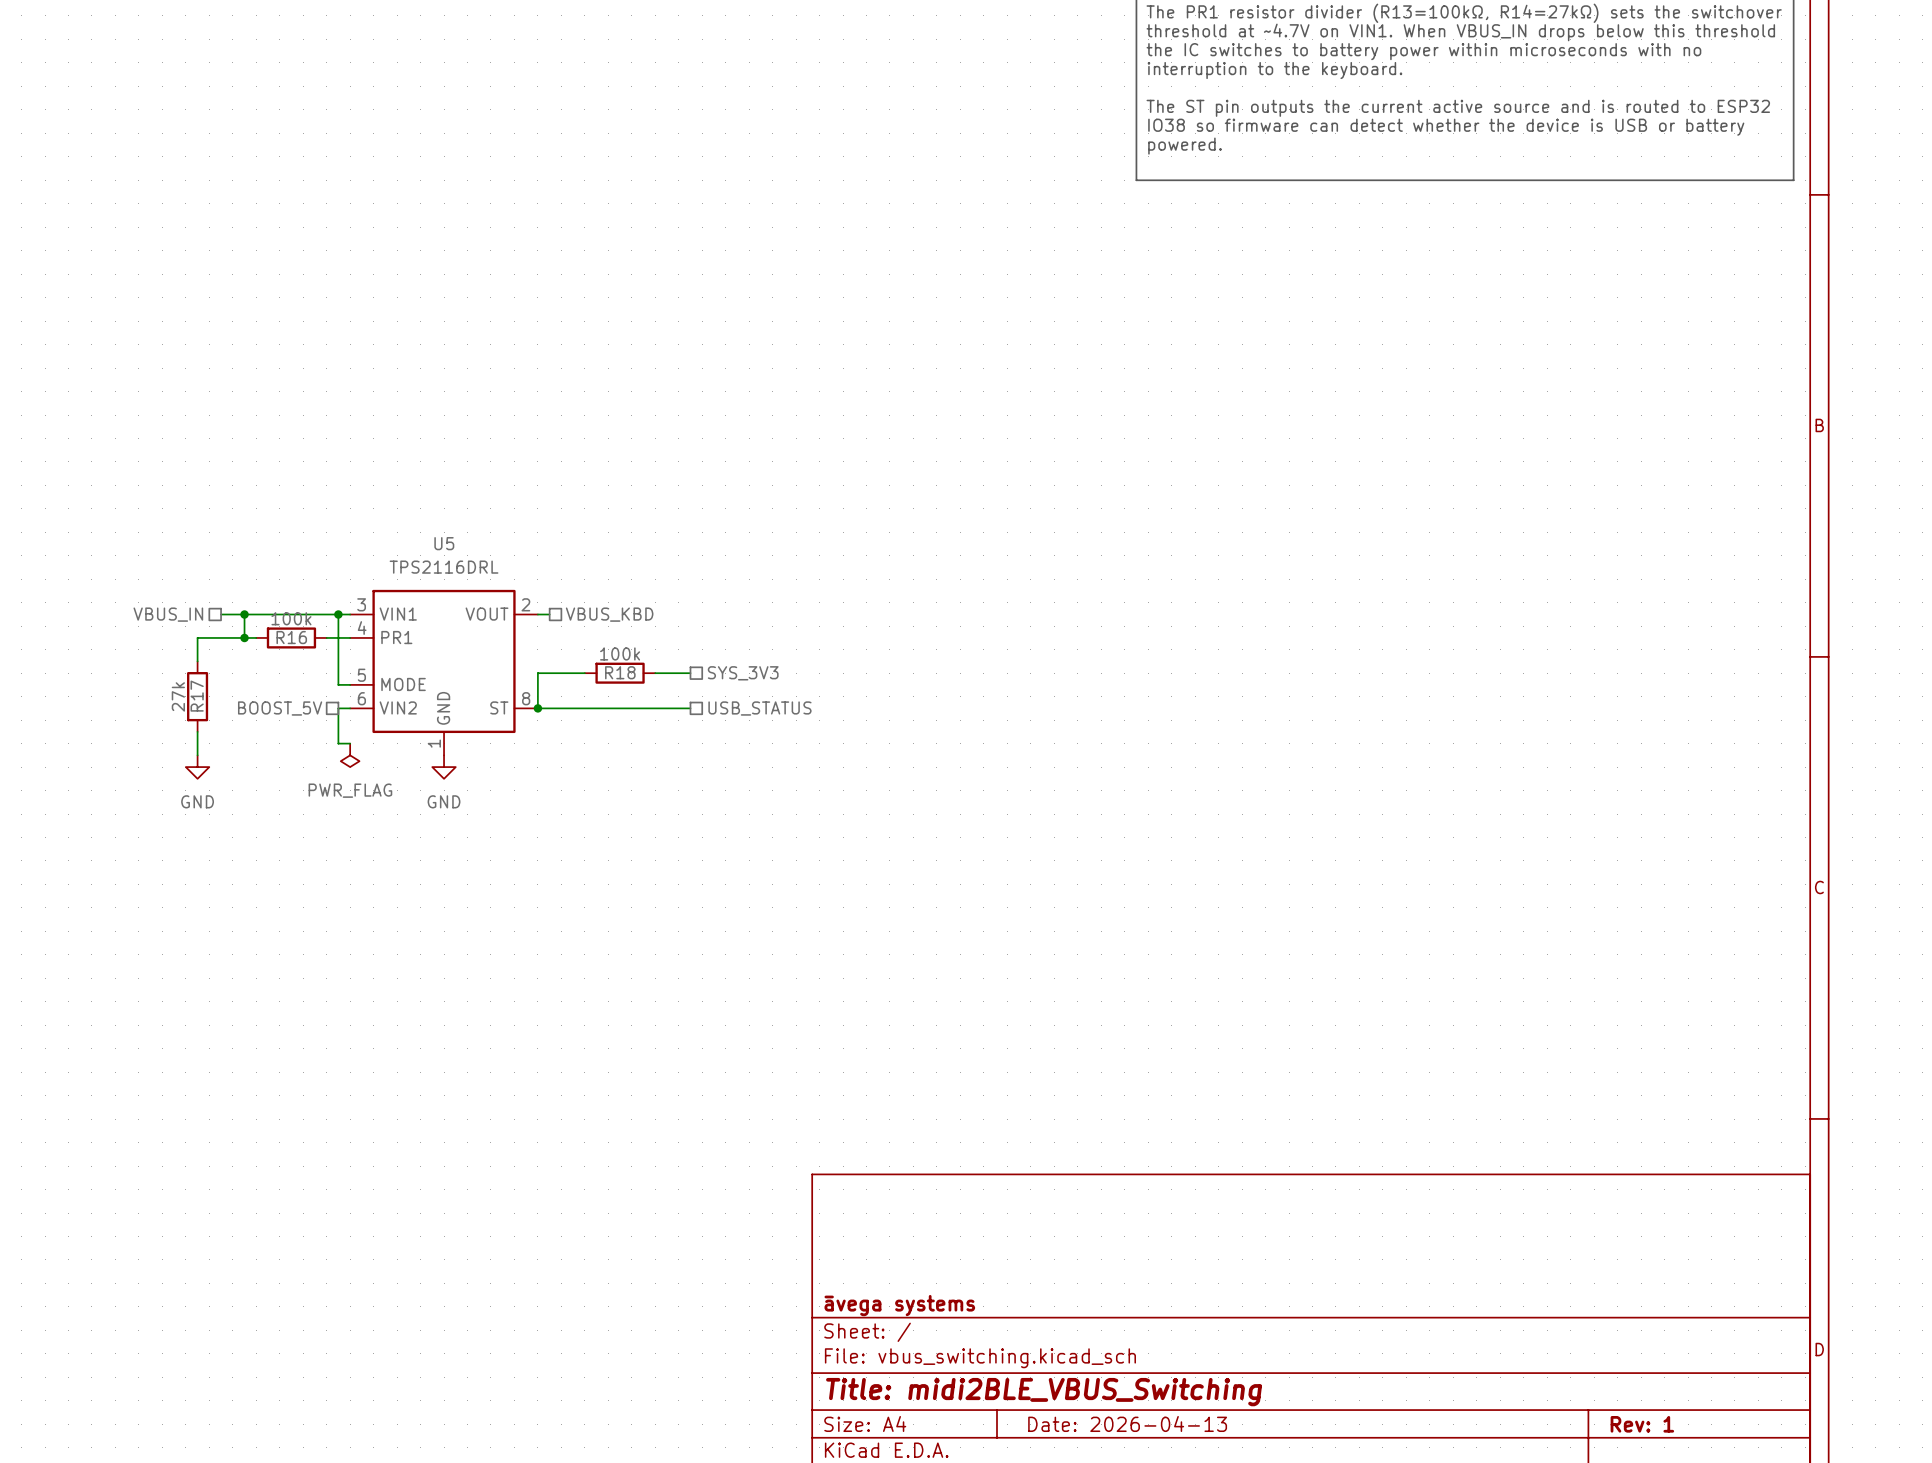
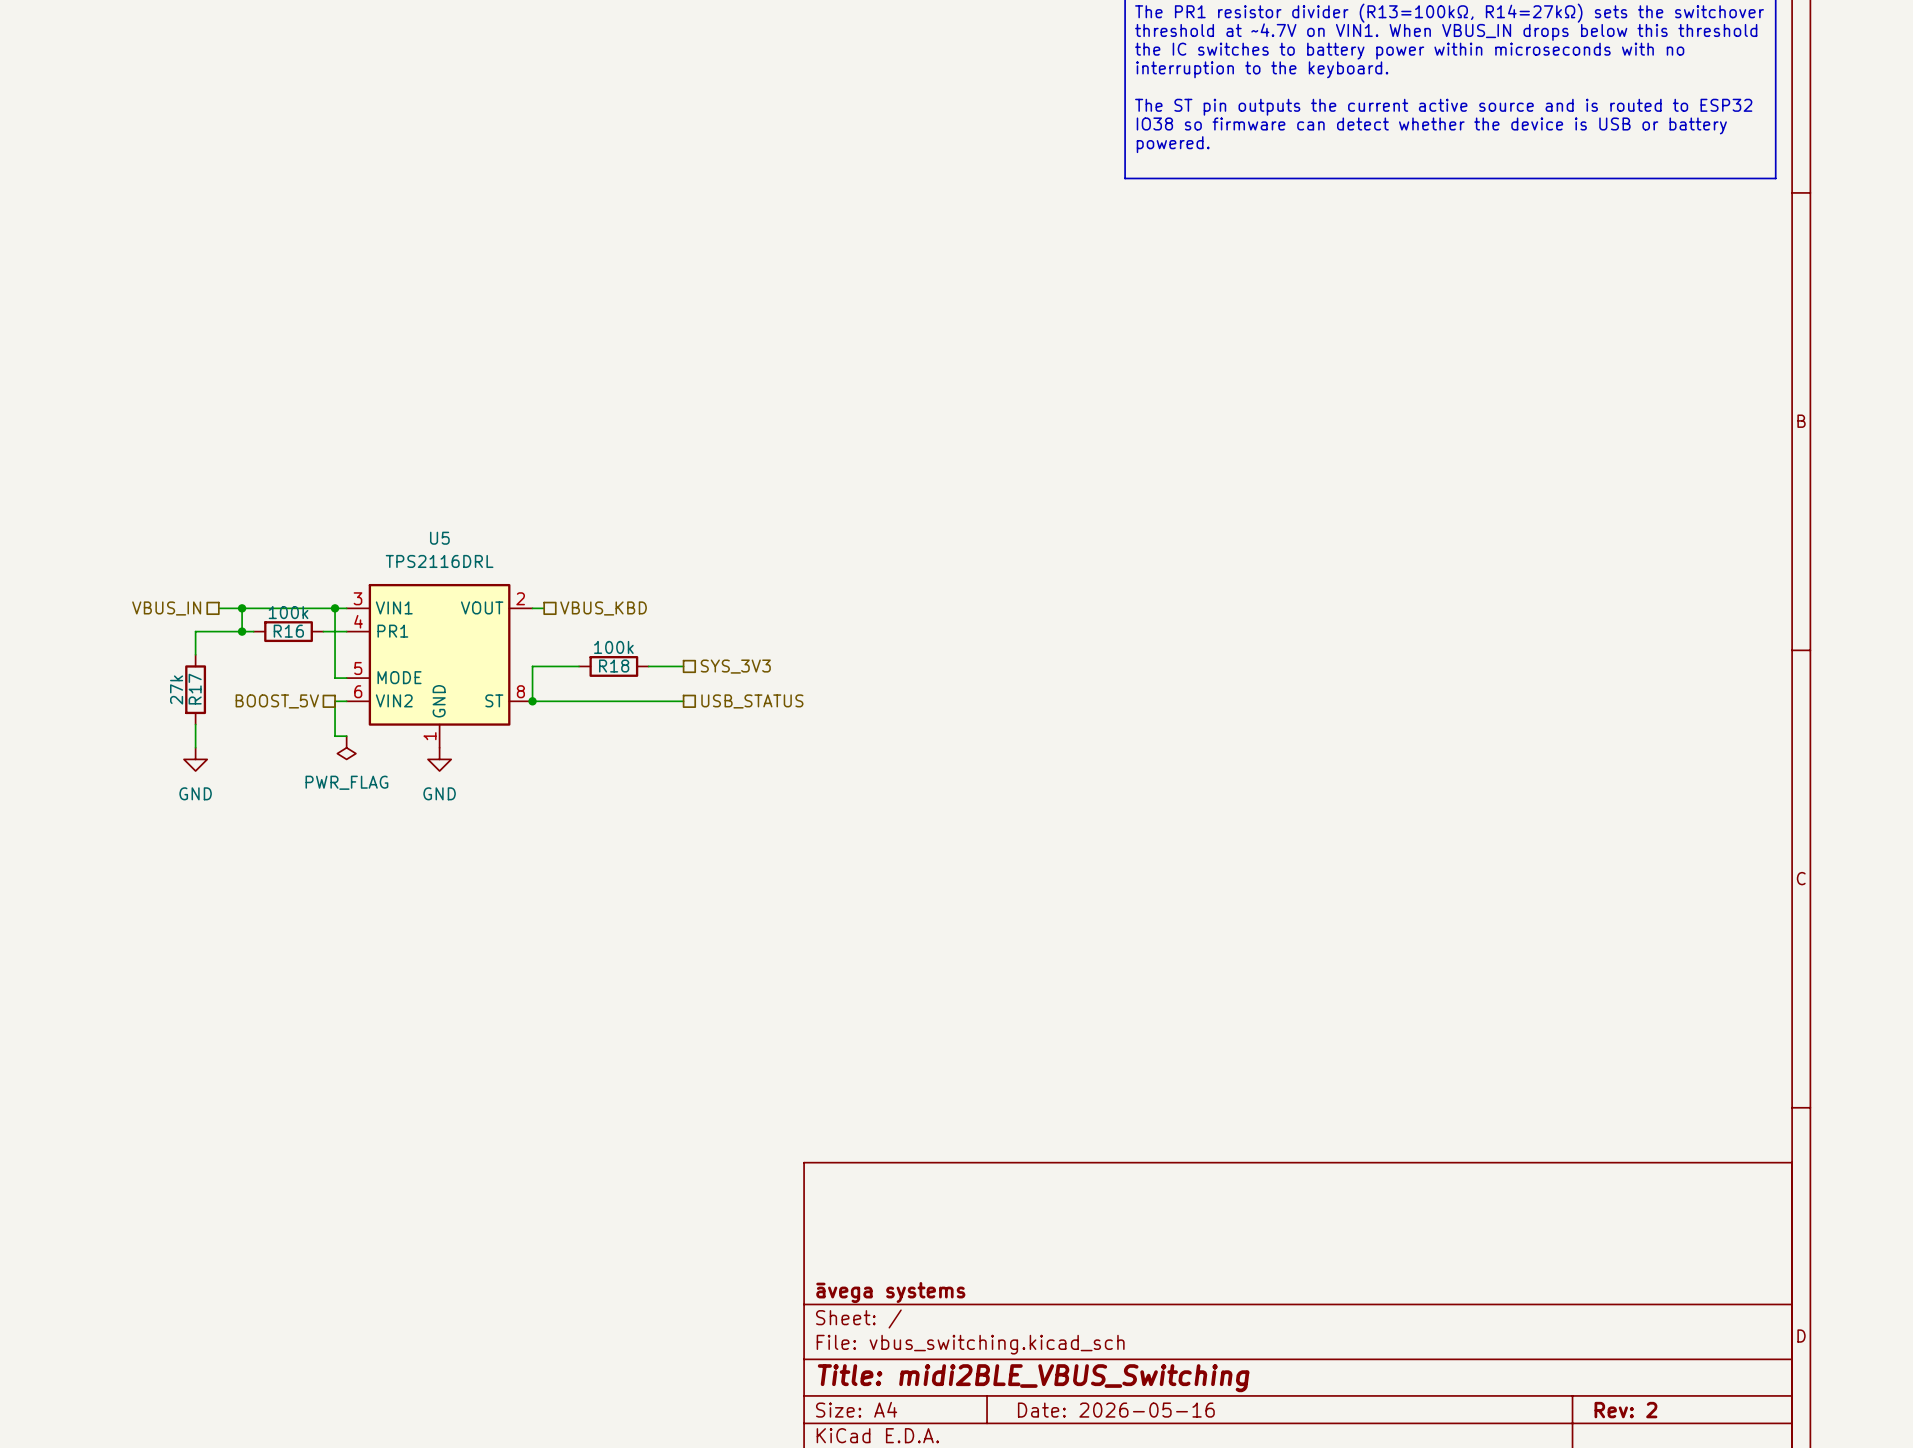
title block: Date: 2026-04-13 (1127, 1423) -> Date: 2026-05-16 (1116, 1410)
title block: Rev: 1 (1642, 1424) -> Rev: 2 (1625, 1410)

